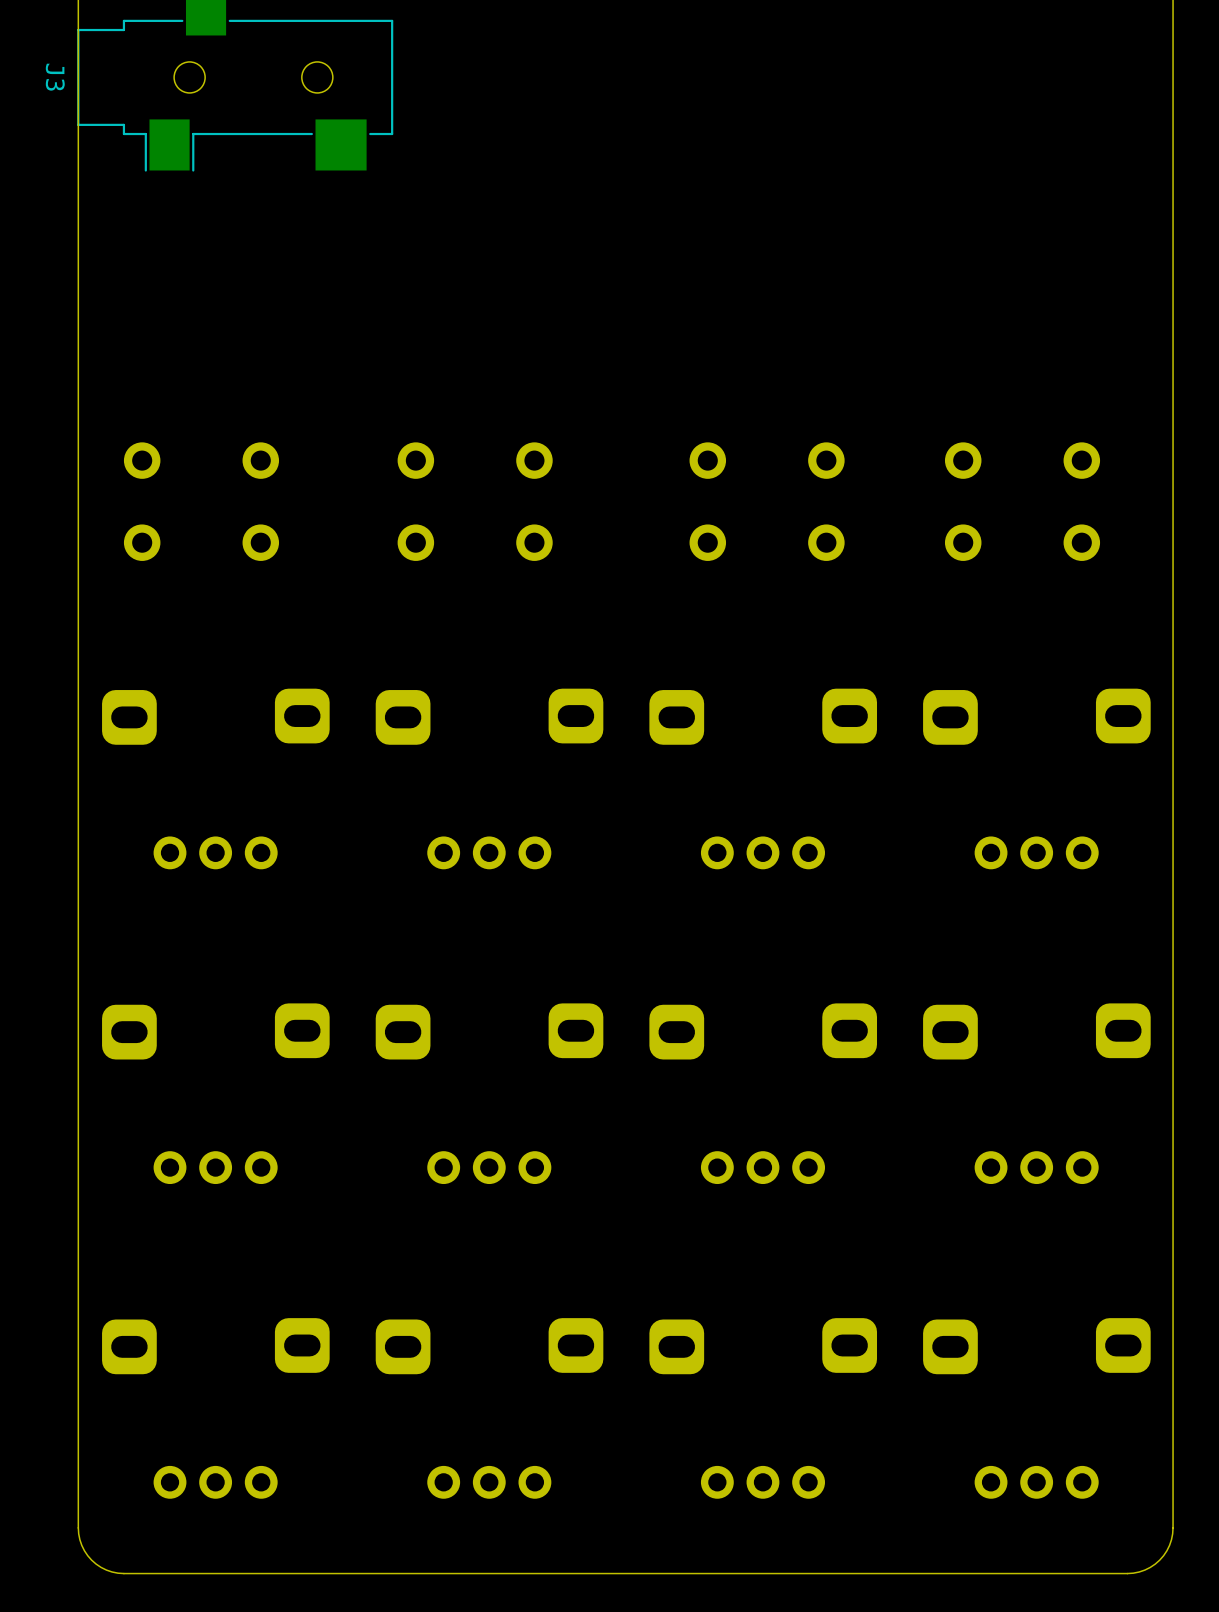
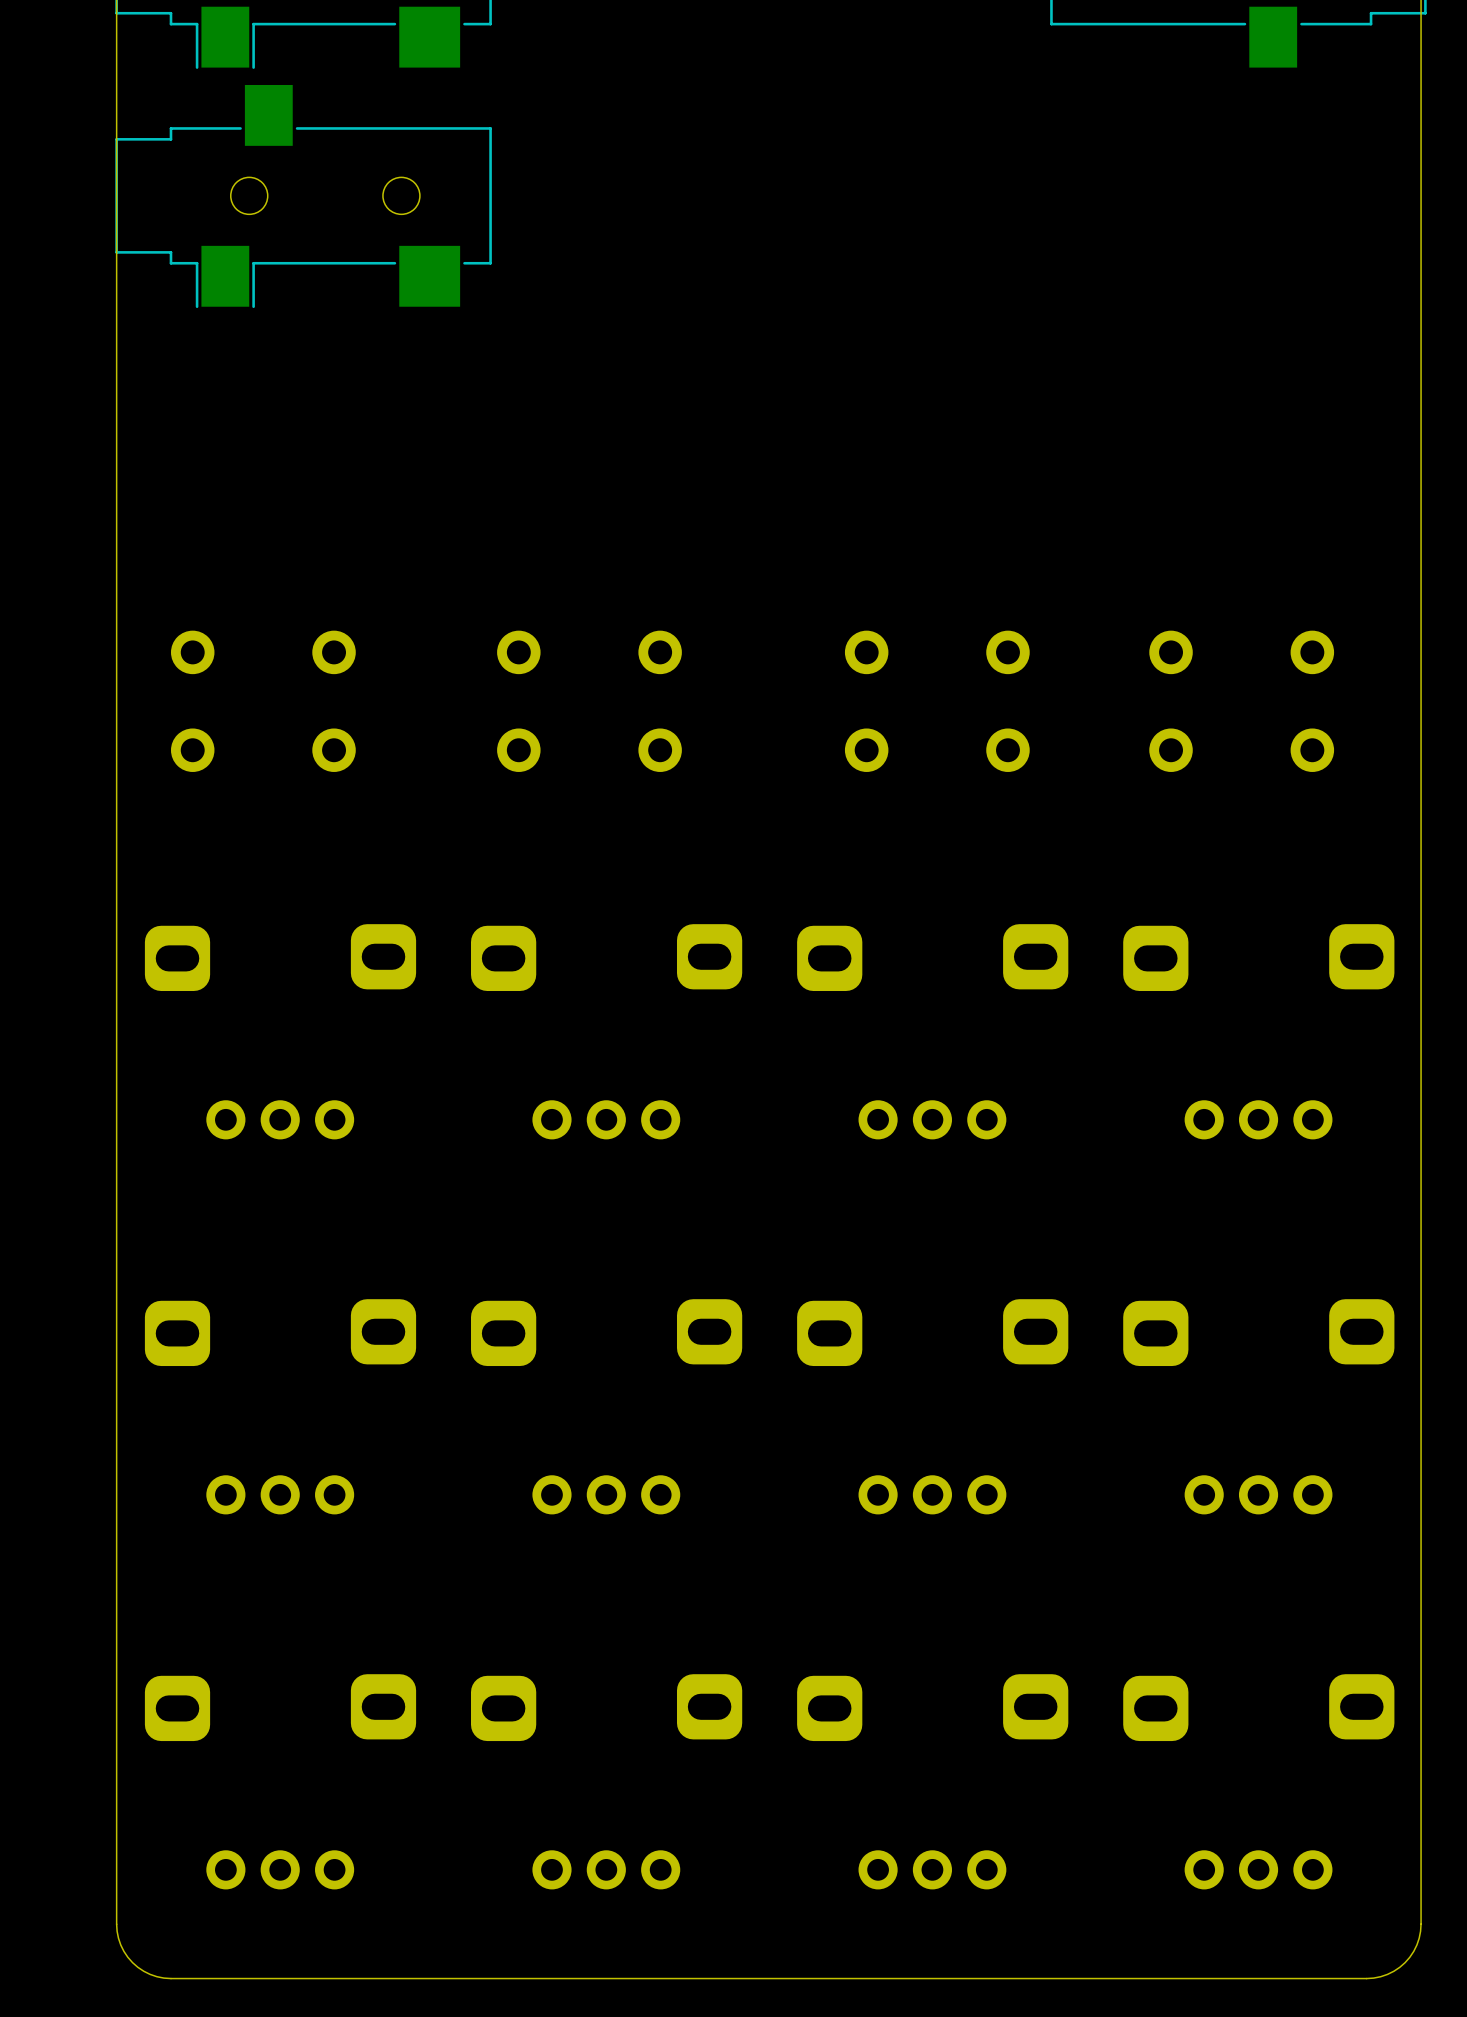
J3 name: J3 (55, 77) -> none

